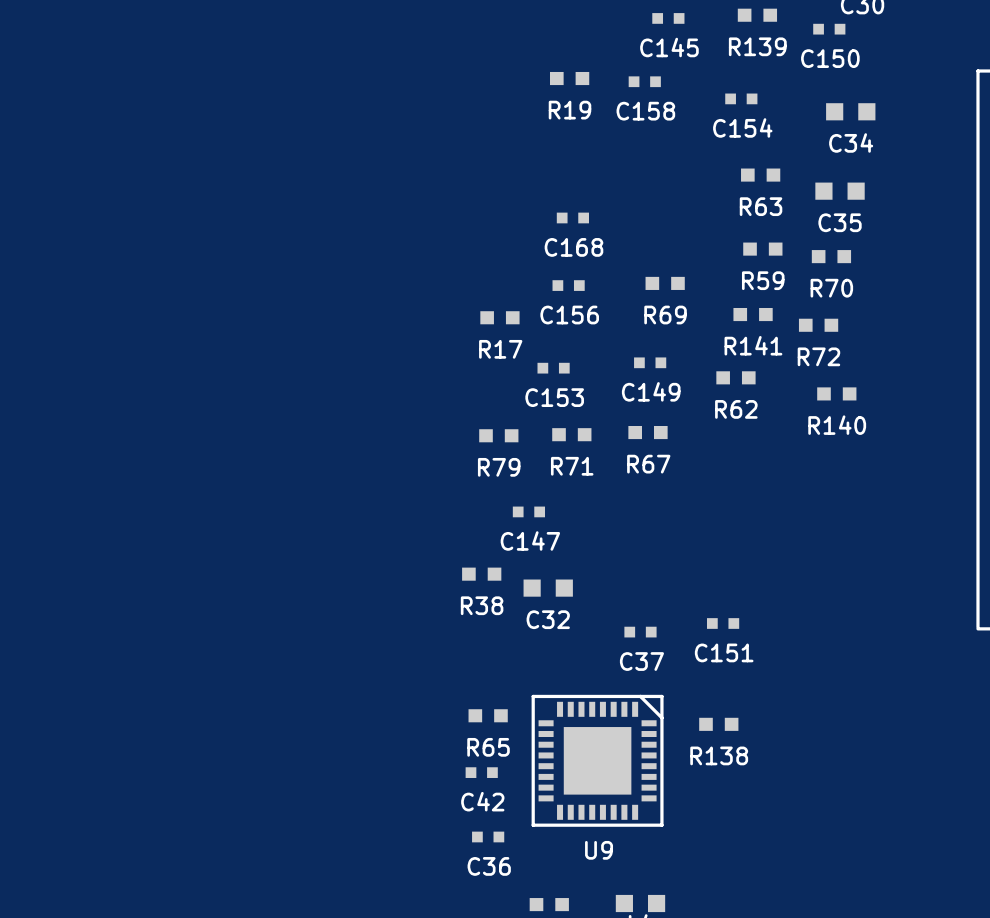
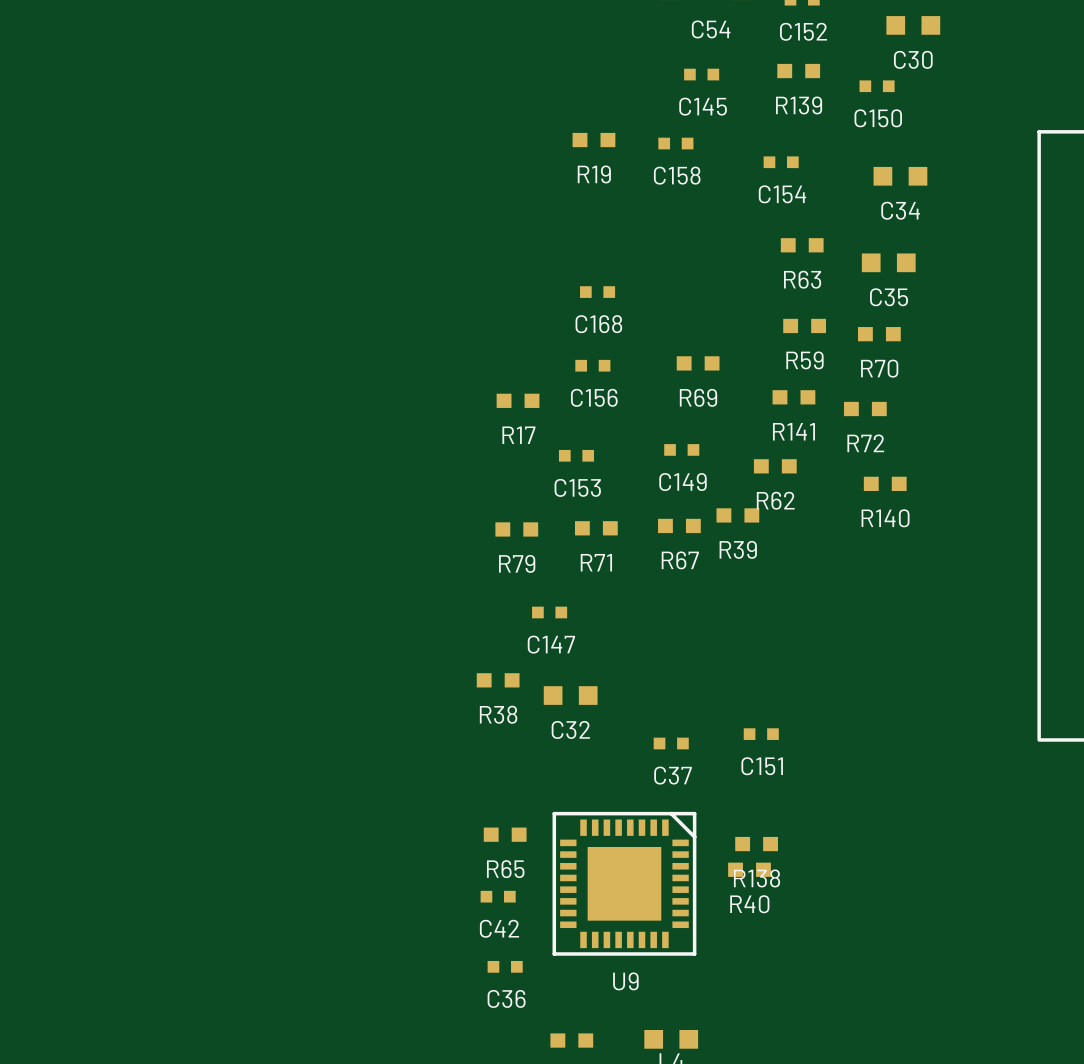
R39: none -> (737, 515)
R40: none -> (749, 869)

